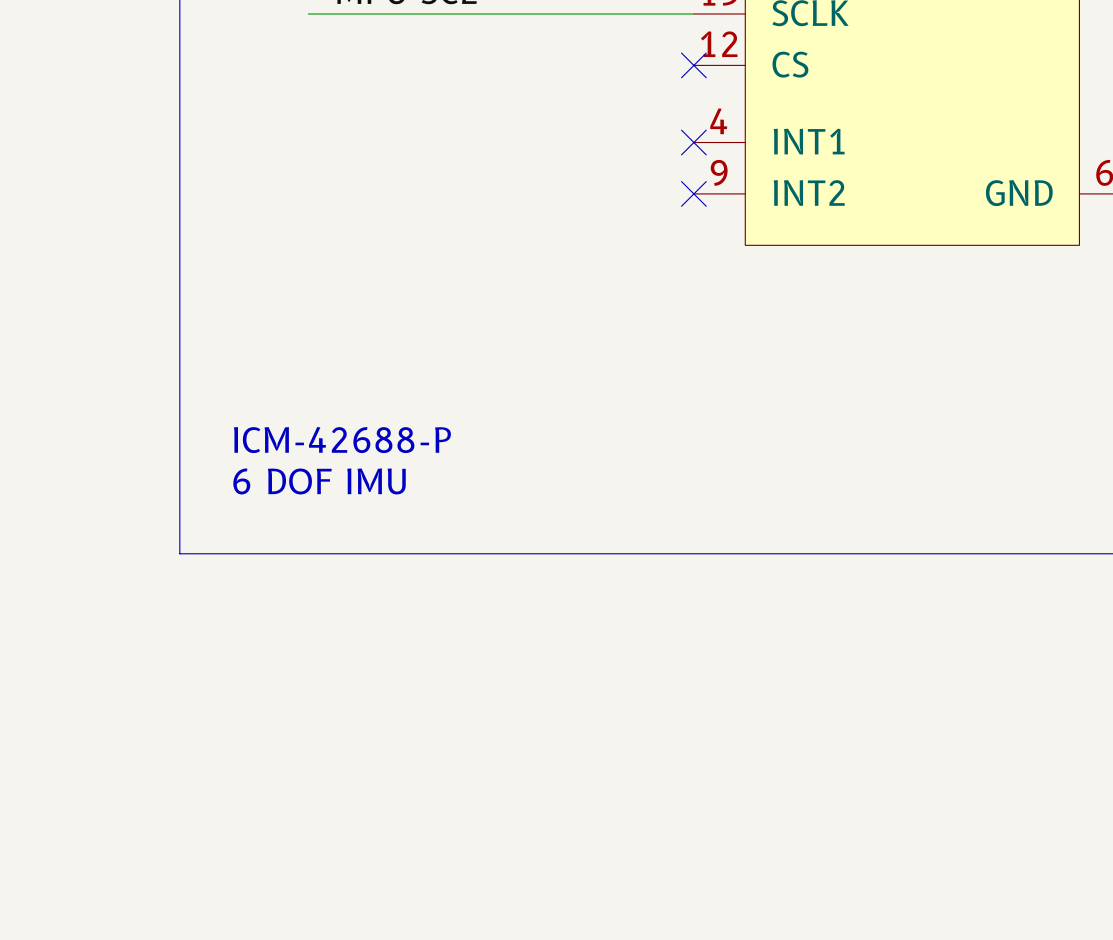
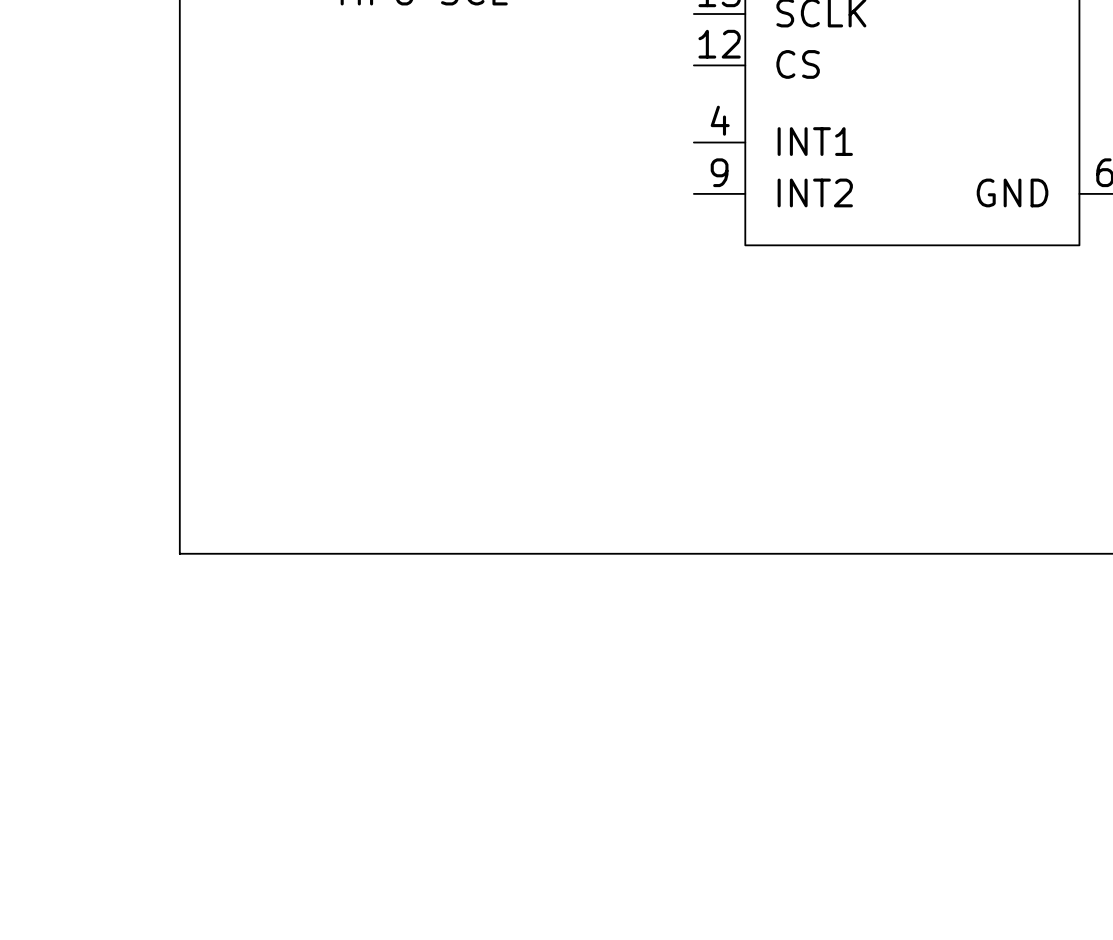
wire: (308, 14) (693, 14) -> none
no-connect mark: (693, 65) -> none
no-connect mark: (693, 142) -> none
no-connect mark: (693, 193) -> none
text: ICM-42688-P (342, 440) -> none
text: 6 DOF IMU (319, 481) -> none

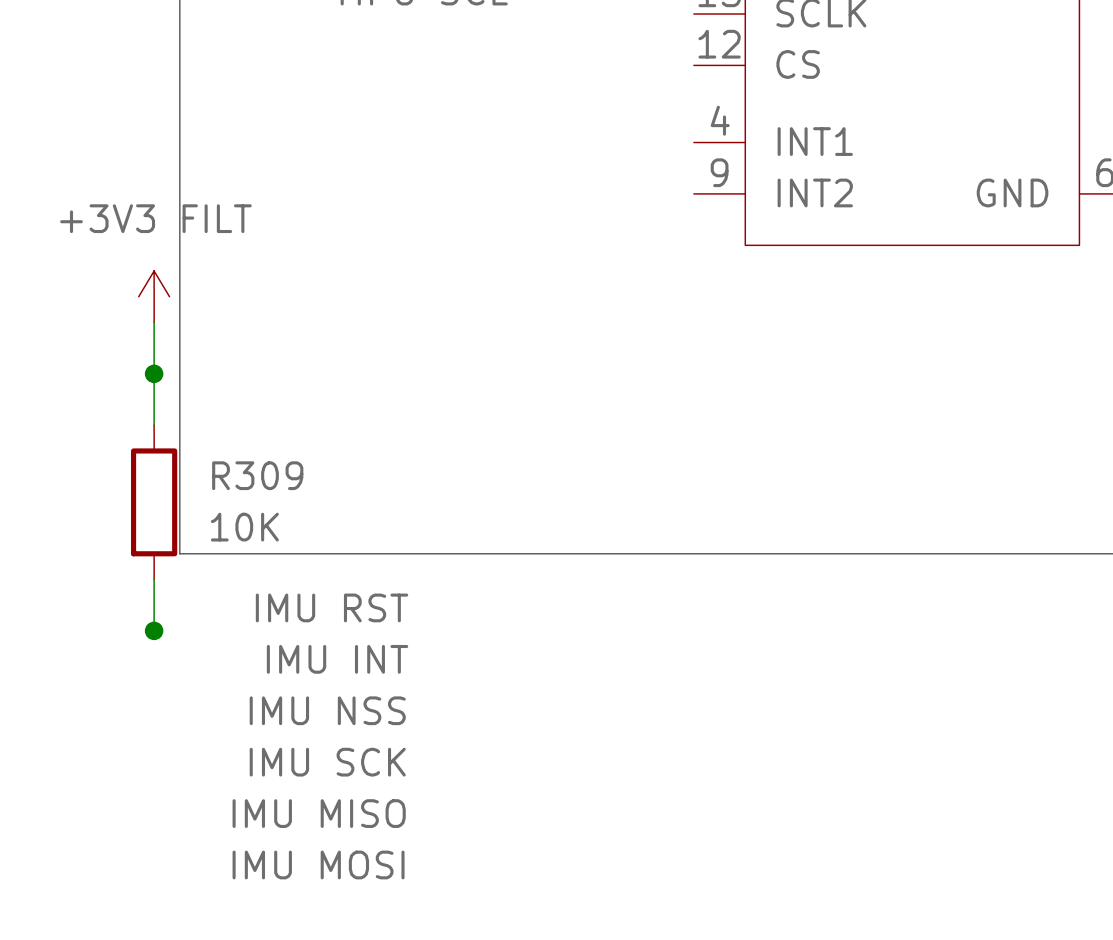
power symbol: none -> +3V3 FILT (154, 296)
wire: none -> (154, 322) (154, 425)
junction: none -> (154, 373)
R309: none -> 10K (154, 502)
wire: none -> (154, 579) (154, 630)
label: none -> IMU RST (332, 607)
junction: none -> (154, 630)
label: none -> IMU INT (337, 659)
label: none -> IMU NSS (327, 710)
label: none -> IMU SCK (327, 762)
label: none -> IMU MISO (319, 813)
label: none -> IMU MOSI (318, 864)

